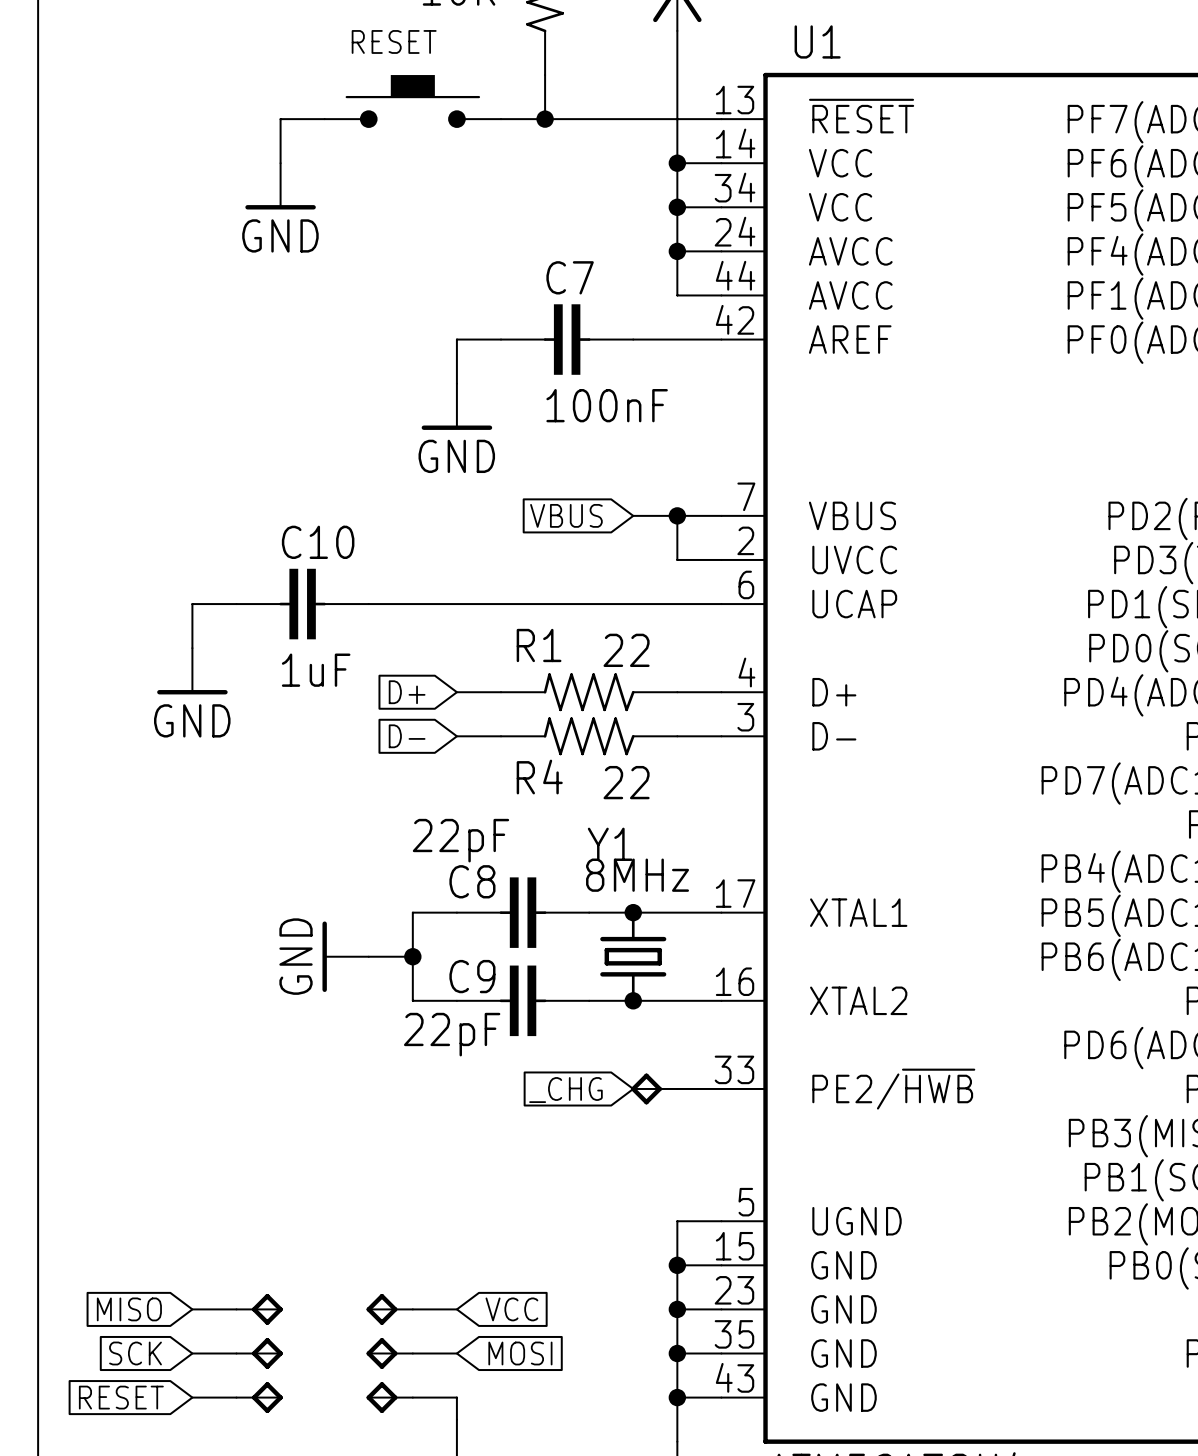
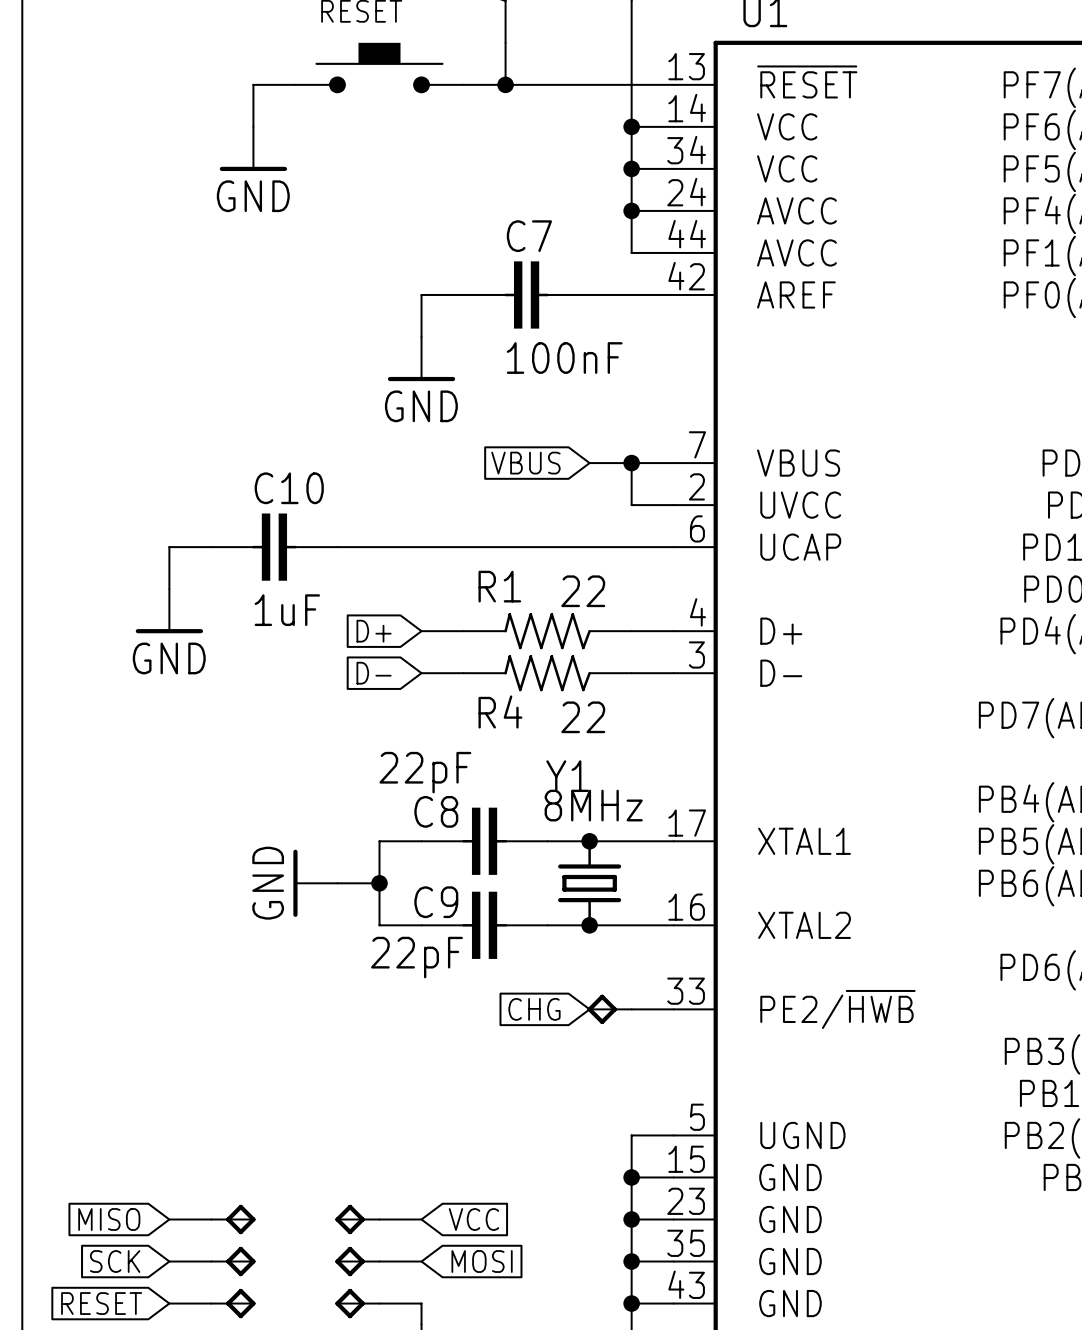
global label: _CHG (565, 1090) -> CHG (534, 1009)

